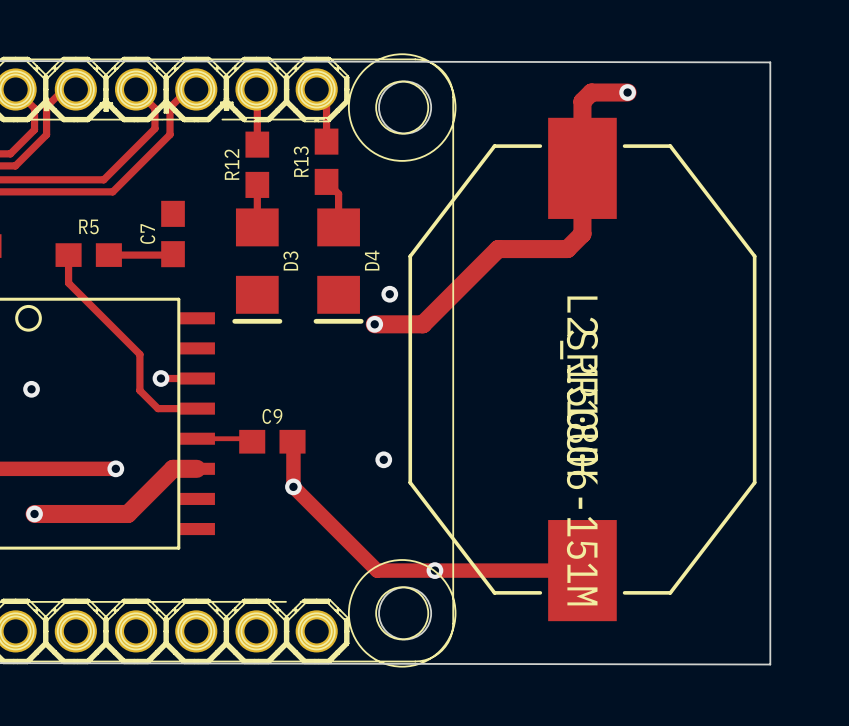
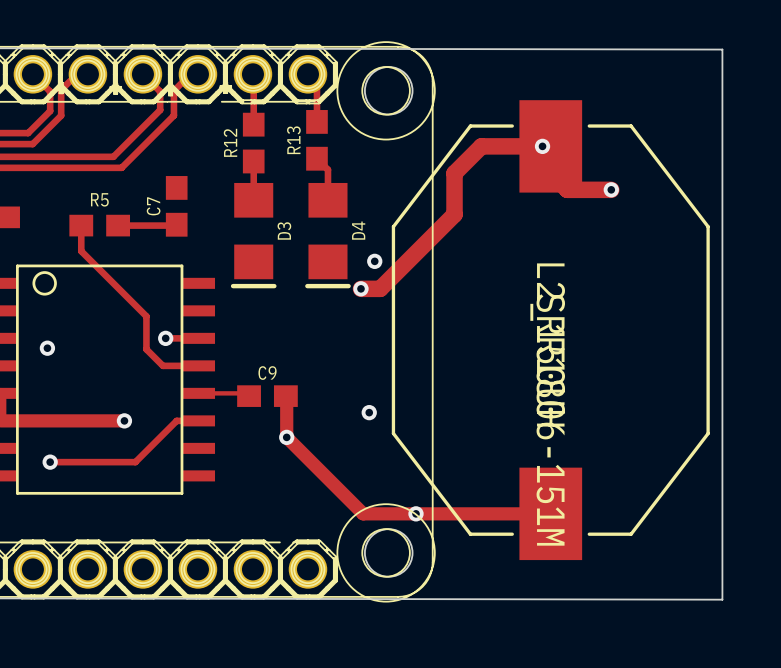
track: (627, 92) (591, 92) (582, 101) (582, 168) -> none
via: (627, 92) -> none
via: none -> (542, 146)
track: (582, 197) (582, 234) (567, 249) (498, 249) (422, 324) (395, 324) -> (550, 146) (481, 146) (454, 173) (454, 214) (380, 288)
track: none -> (550, 173) (567, 189) (611, 189)
via: none -> (611, 189)
track width: thick (196, 468) (173, 468) (127, 513) (34, 513) -> thin (198, 420) (176, 420) (135, 462) (50, 462)

